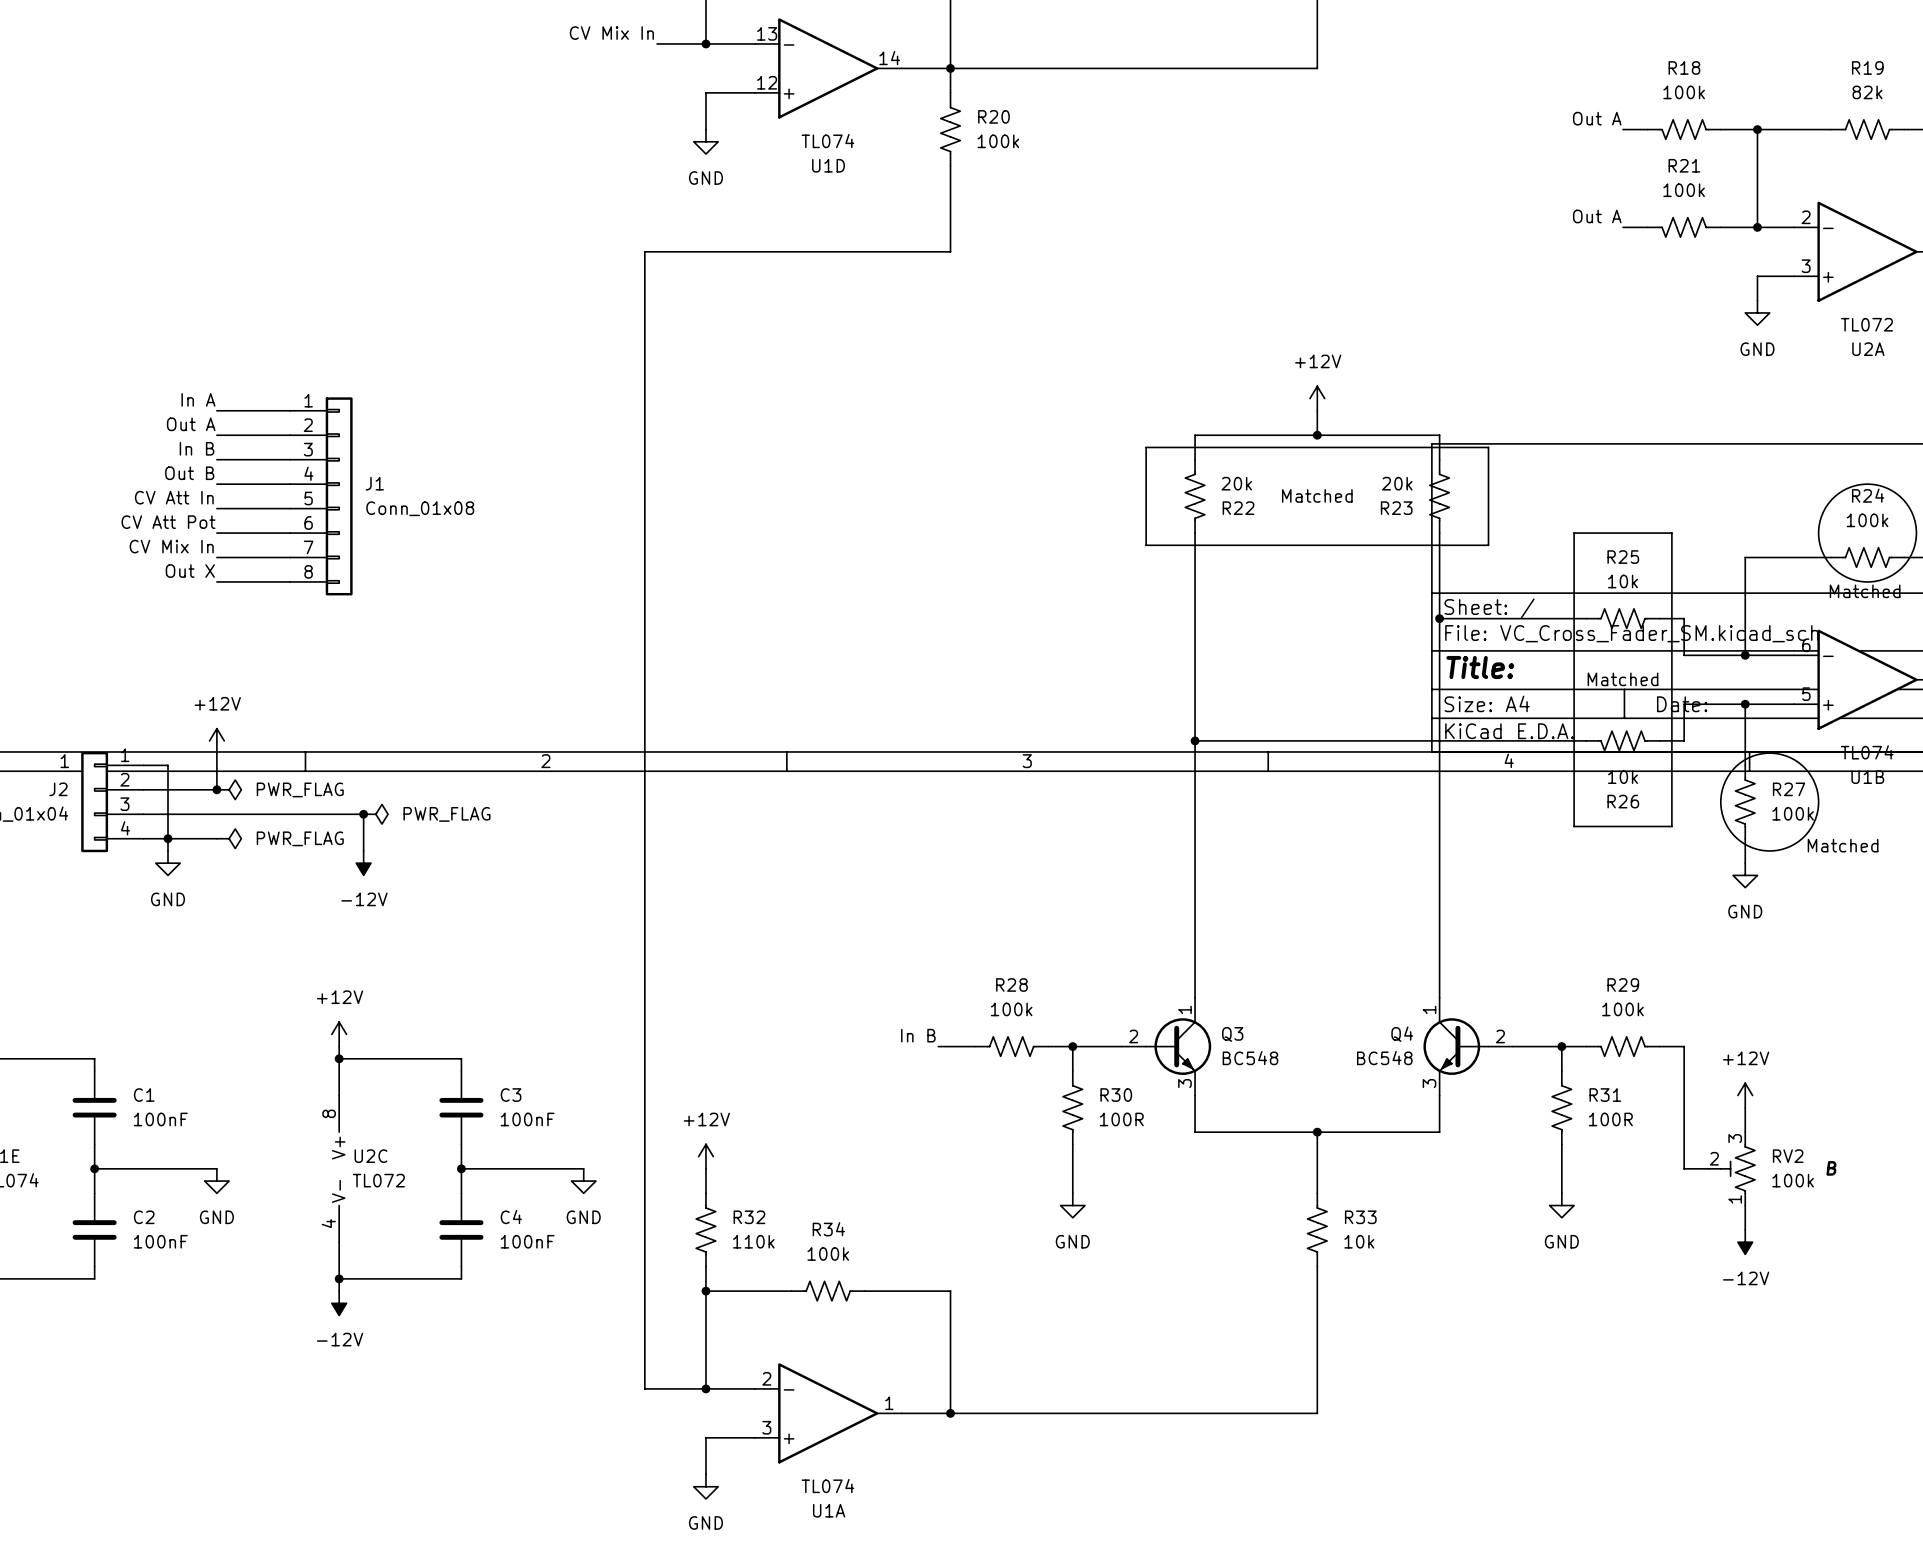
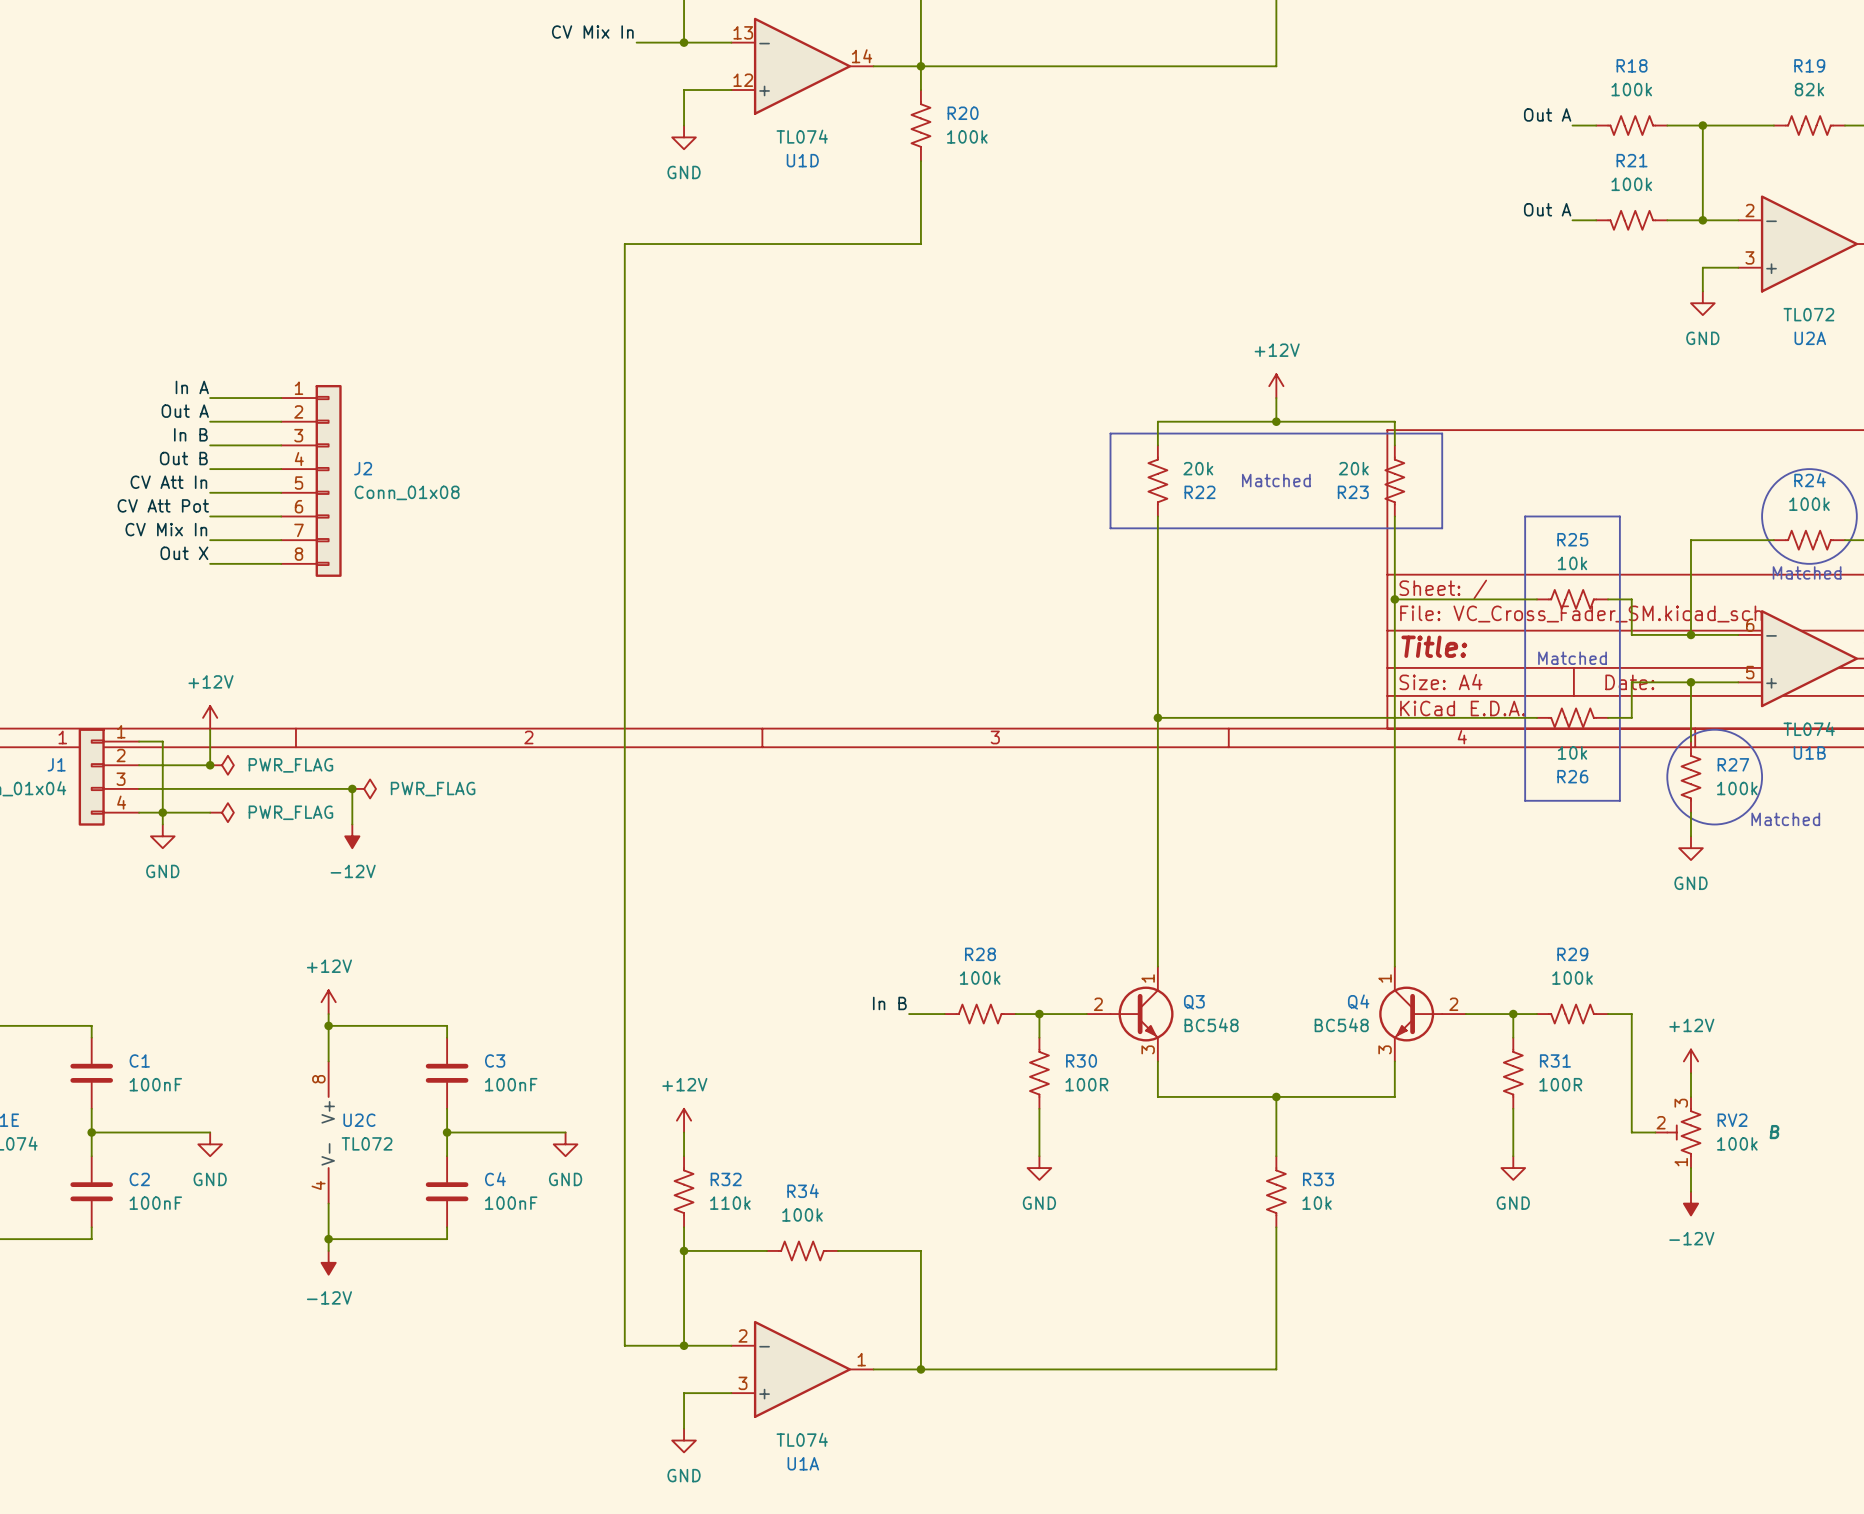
J1 name: J1 (374, 483) -> J2 (363, 468)
J2 name: J2 (58, 789) -> J1 (56, 764)

